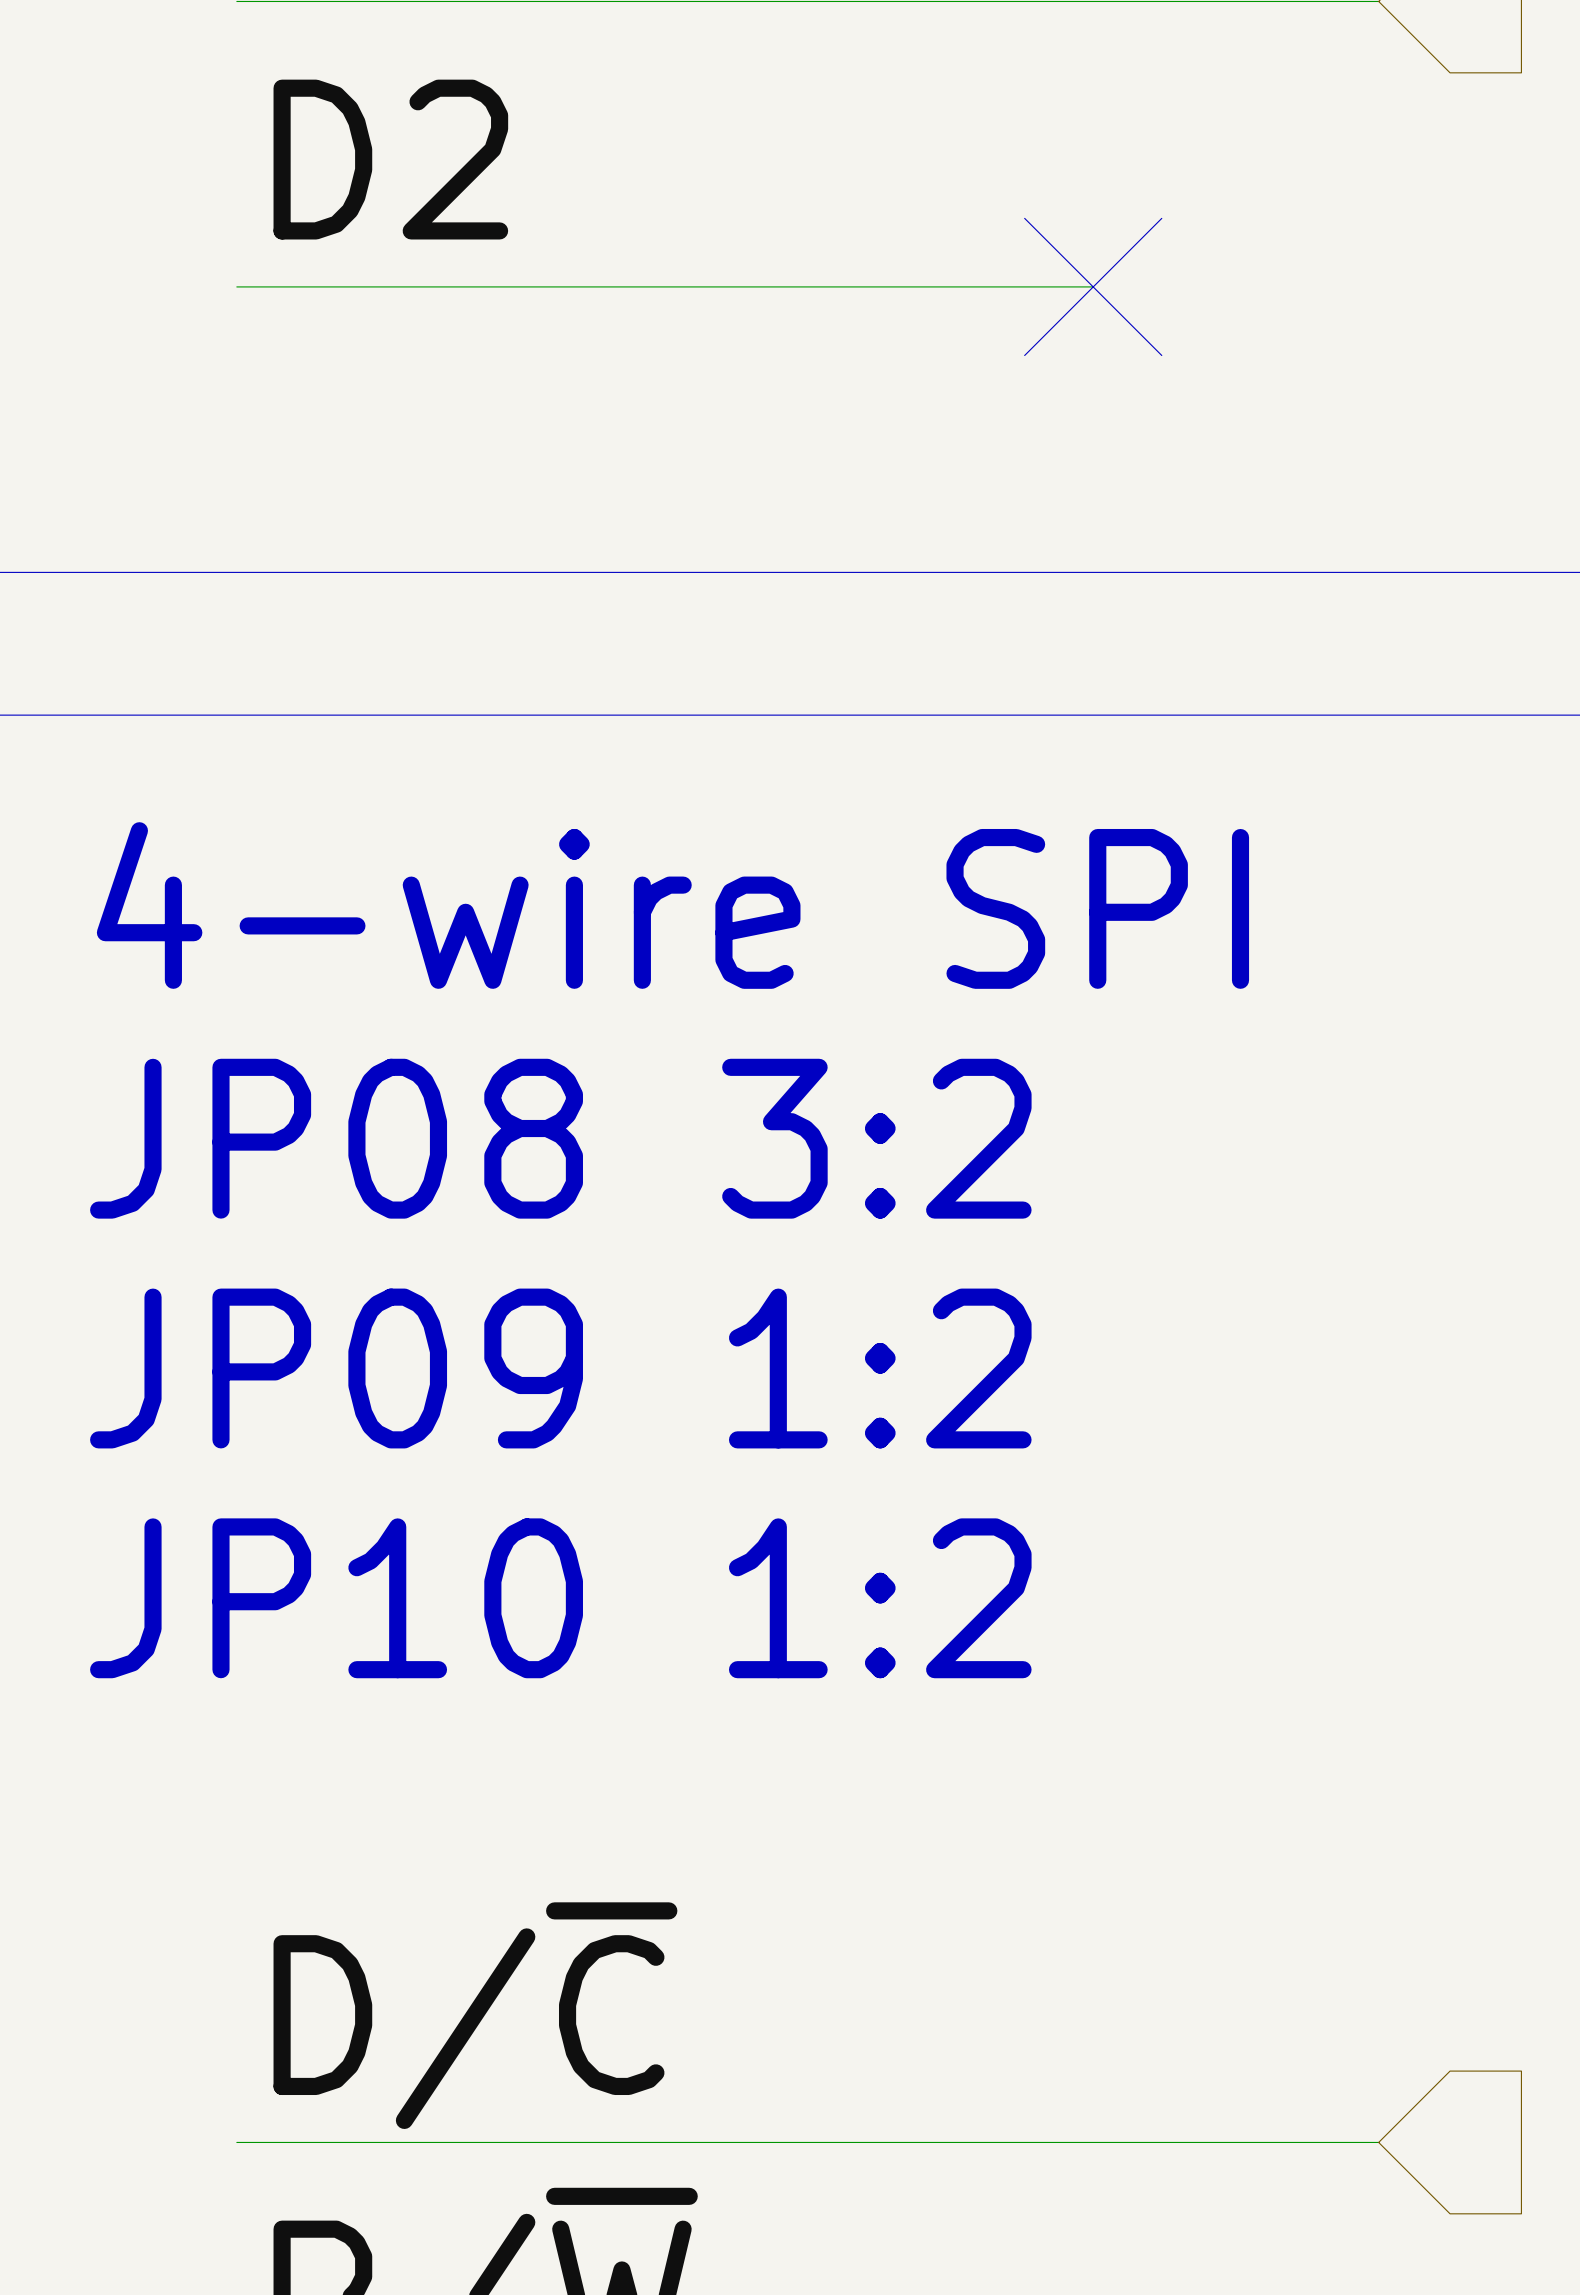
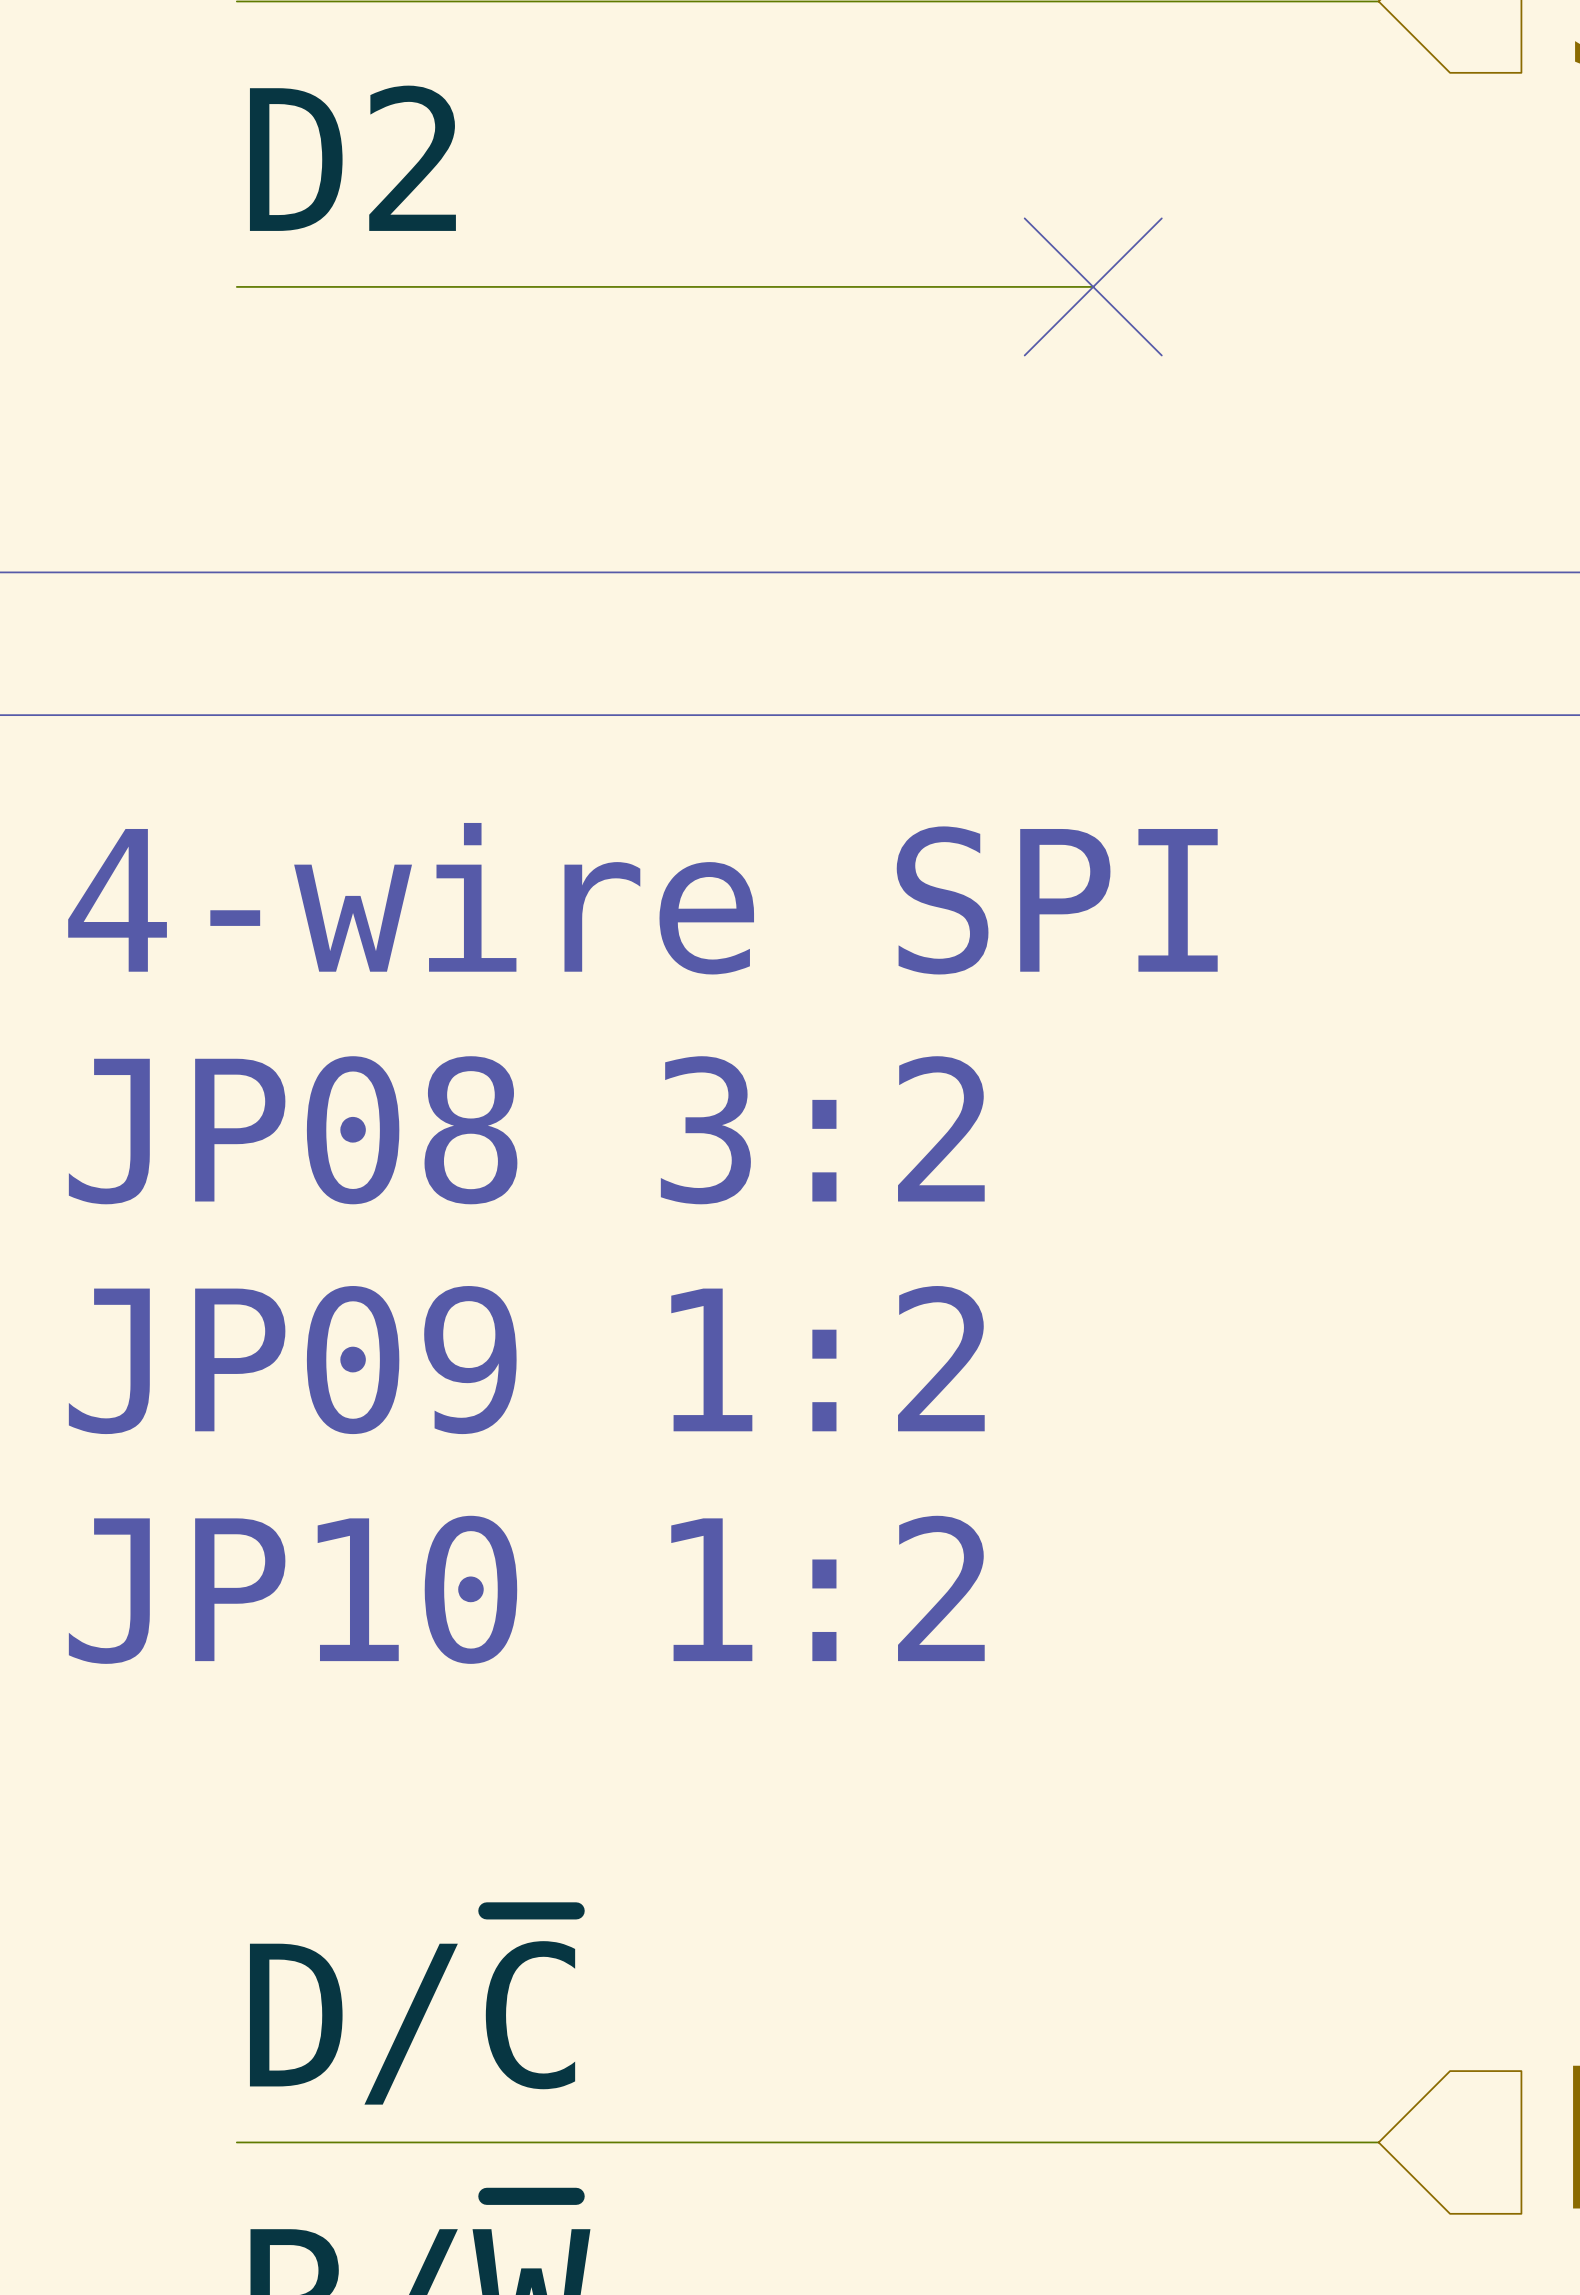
text position: 4-wire SPI (672, 905) -> 4-wire SPI (642, 898)
text position: JP08 3:2 (560, 1138) -> JP08 3:2 (526, 1130)
text position: JP09 1:2 (560, 1368) -> JP09 1:2 (526, 1360)
text position: JP10 1:2 (560, 1598) -> JP10 1:2 (526, 1589)

